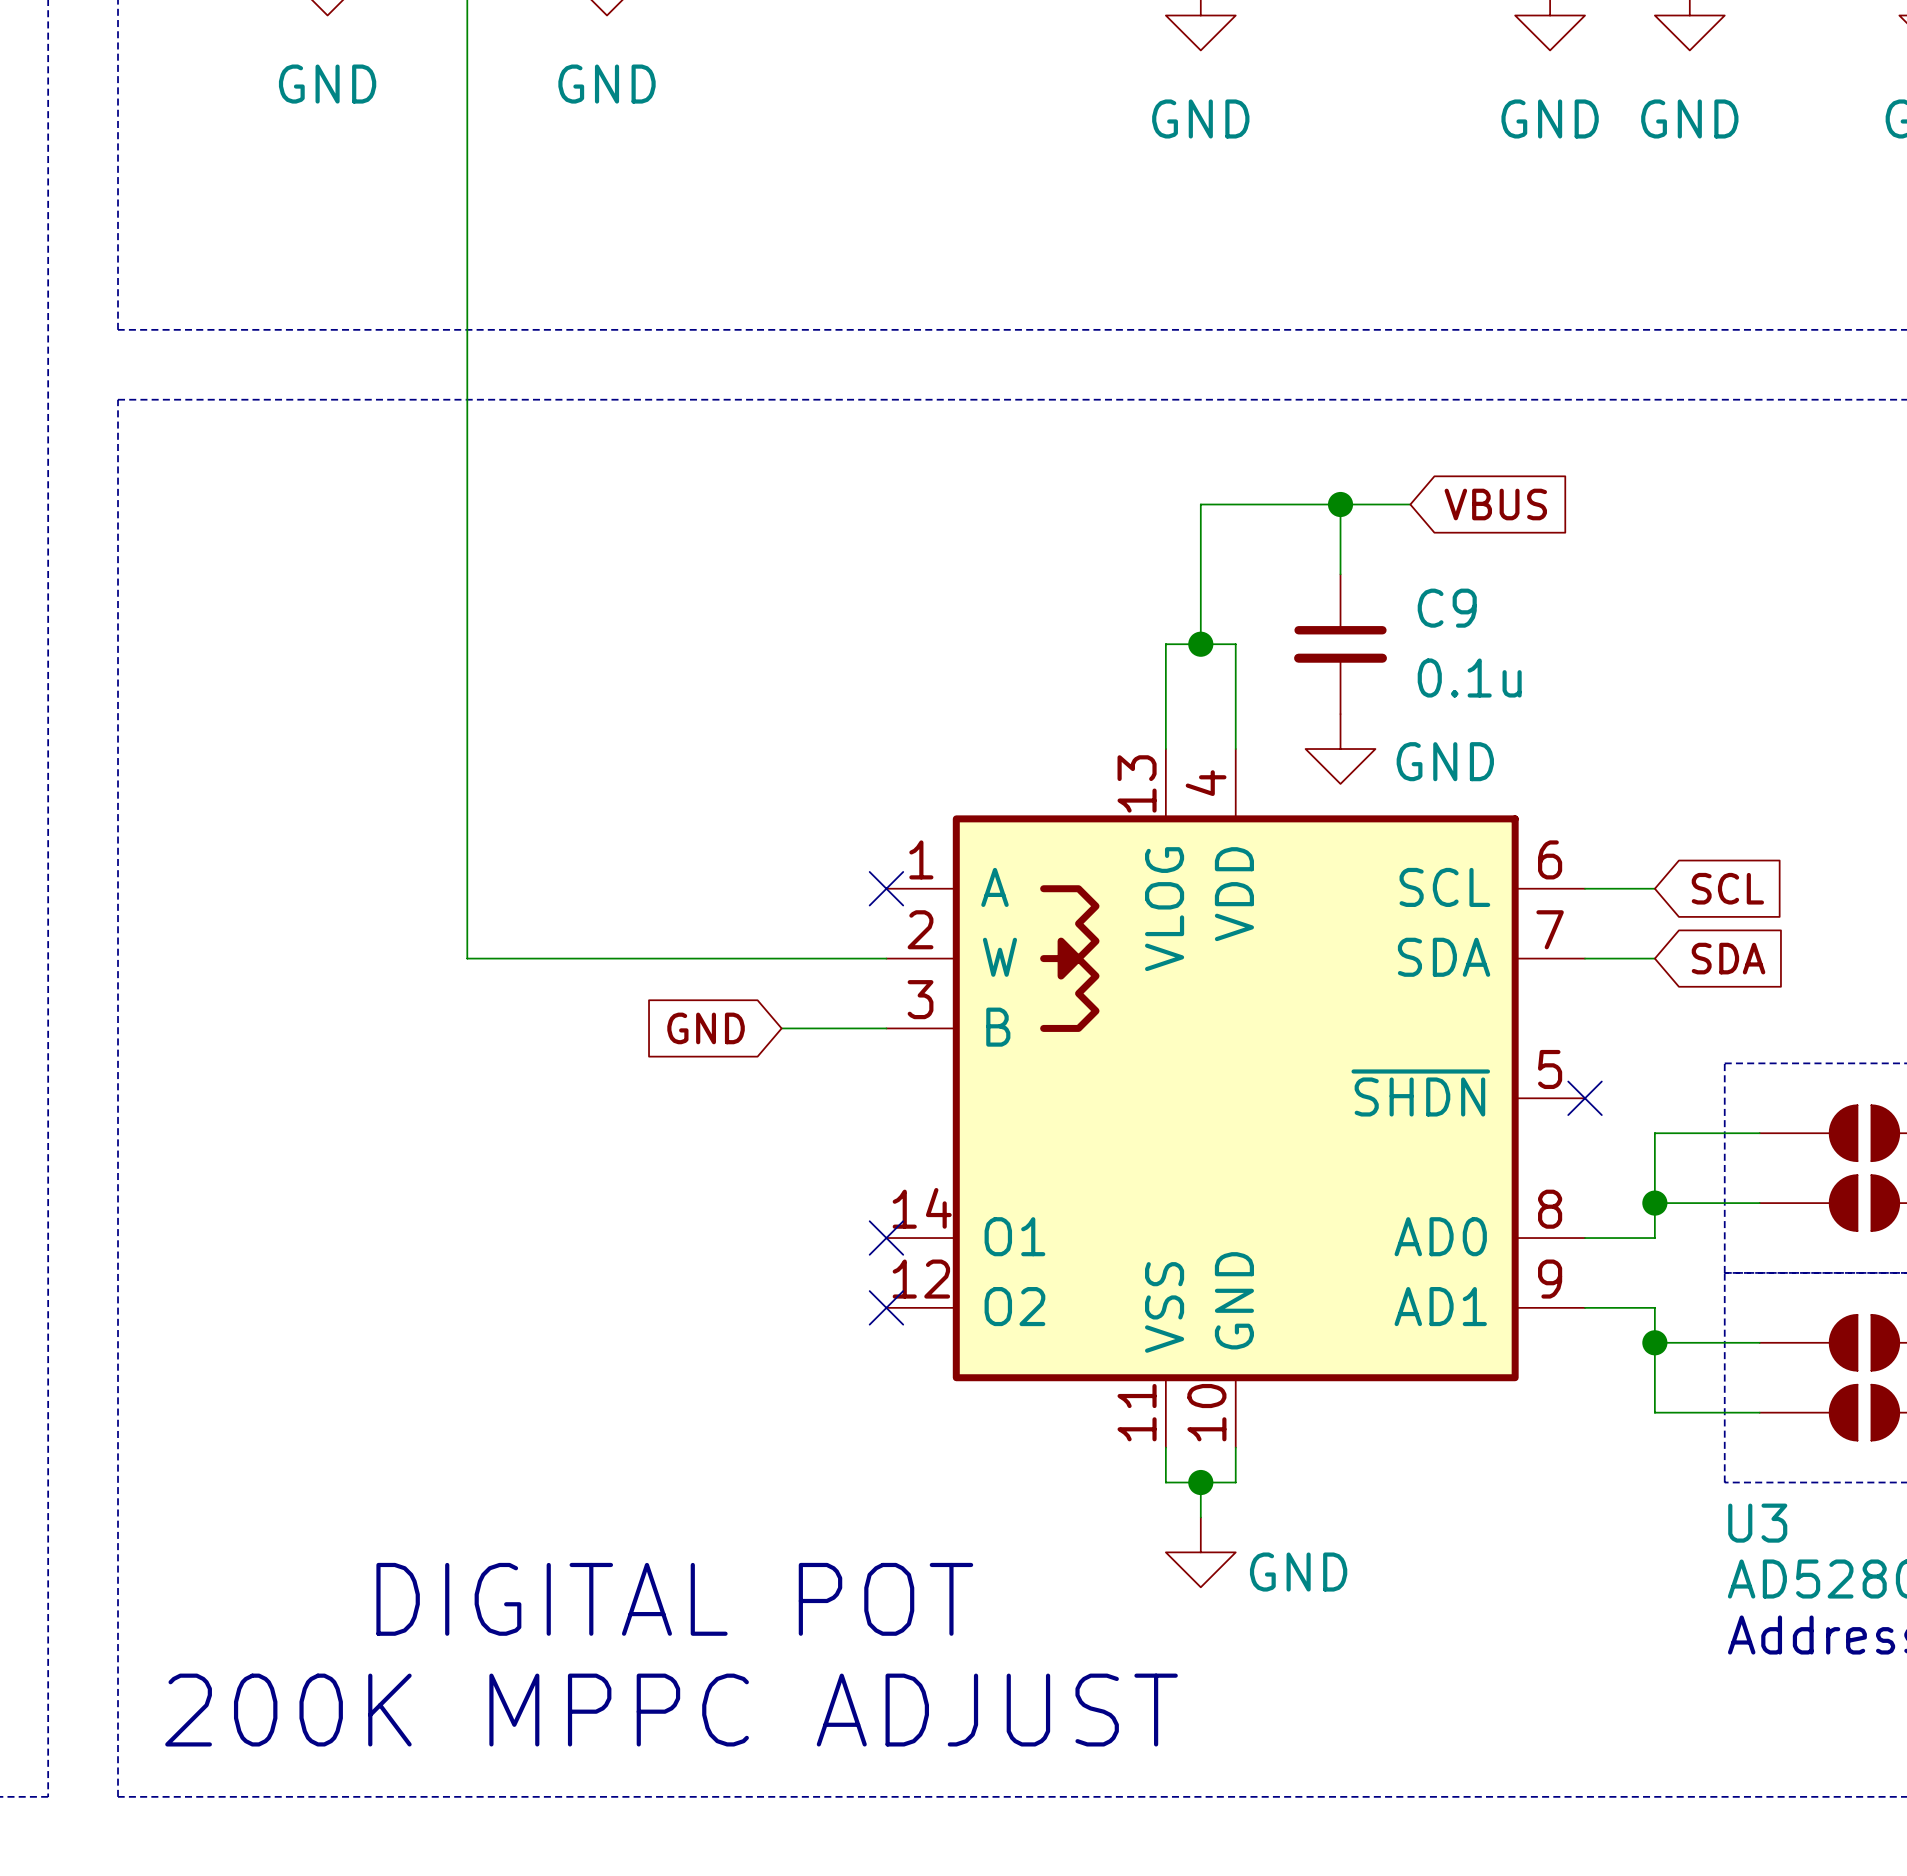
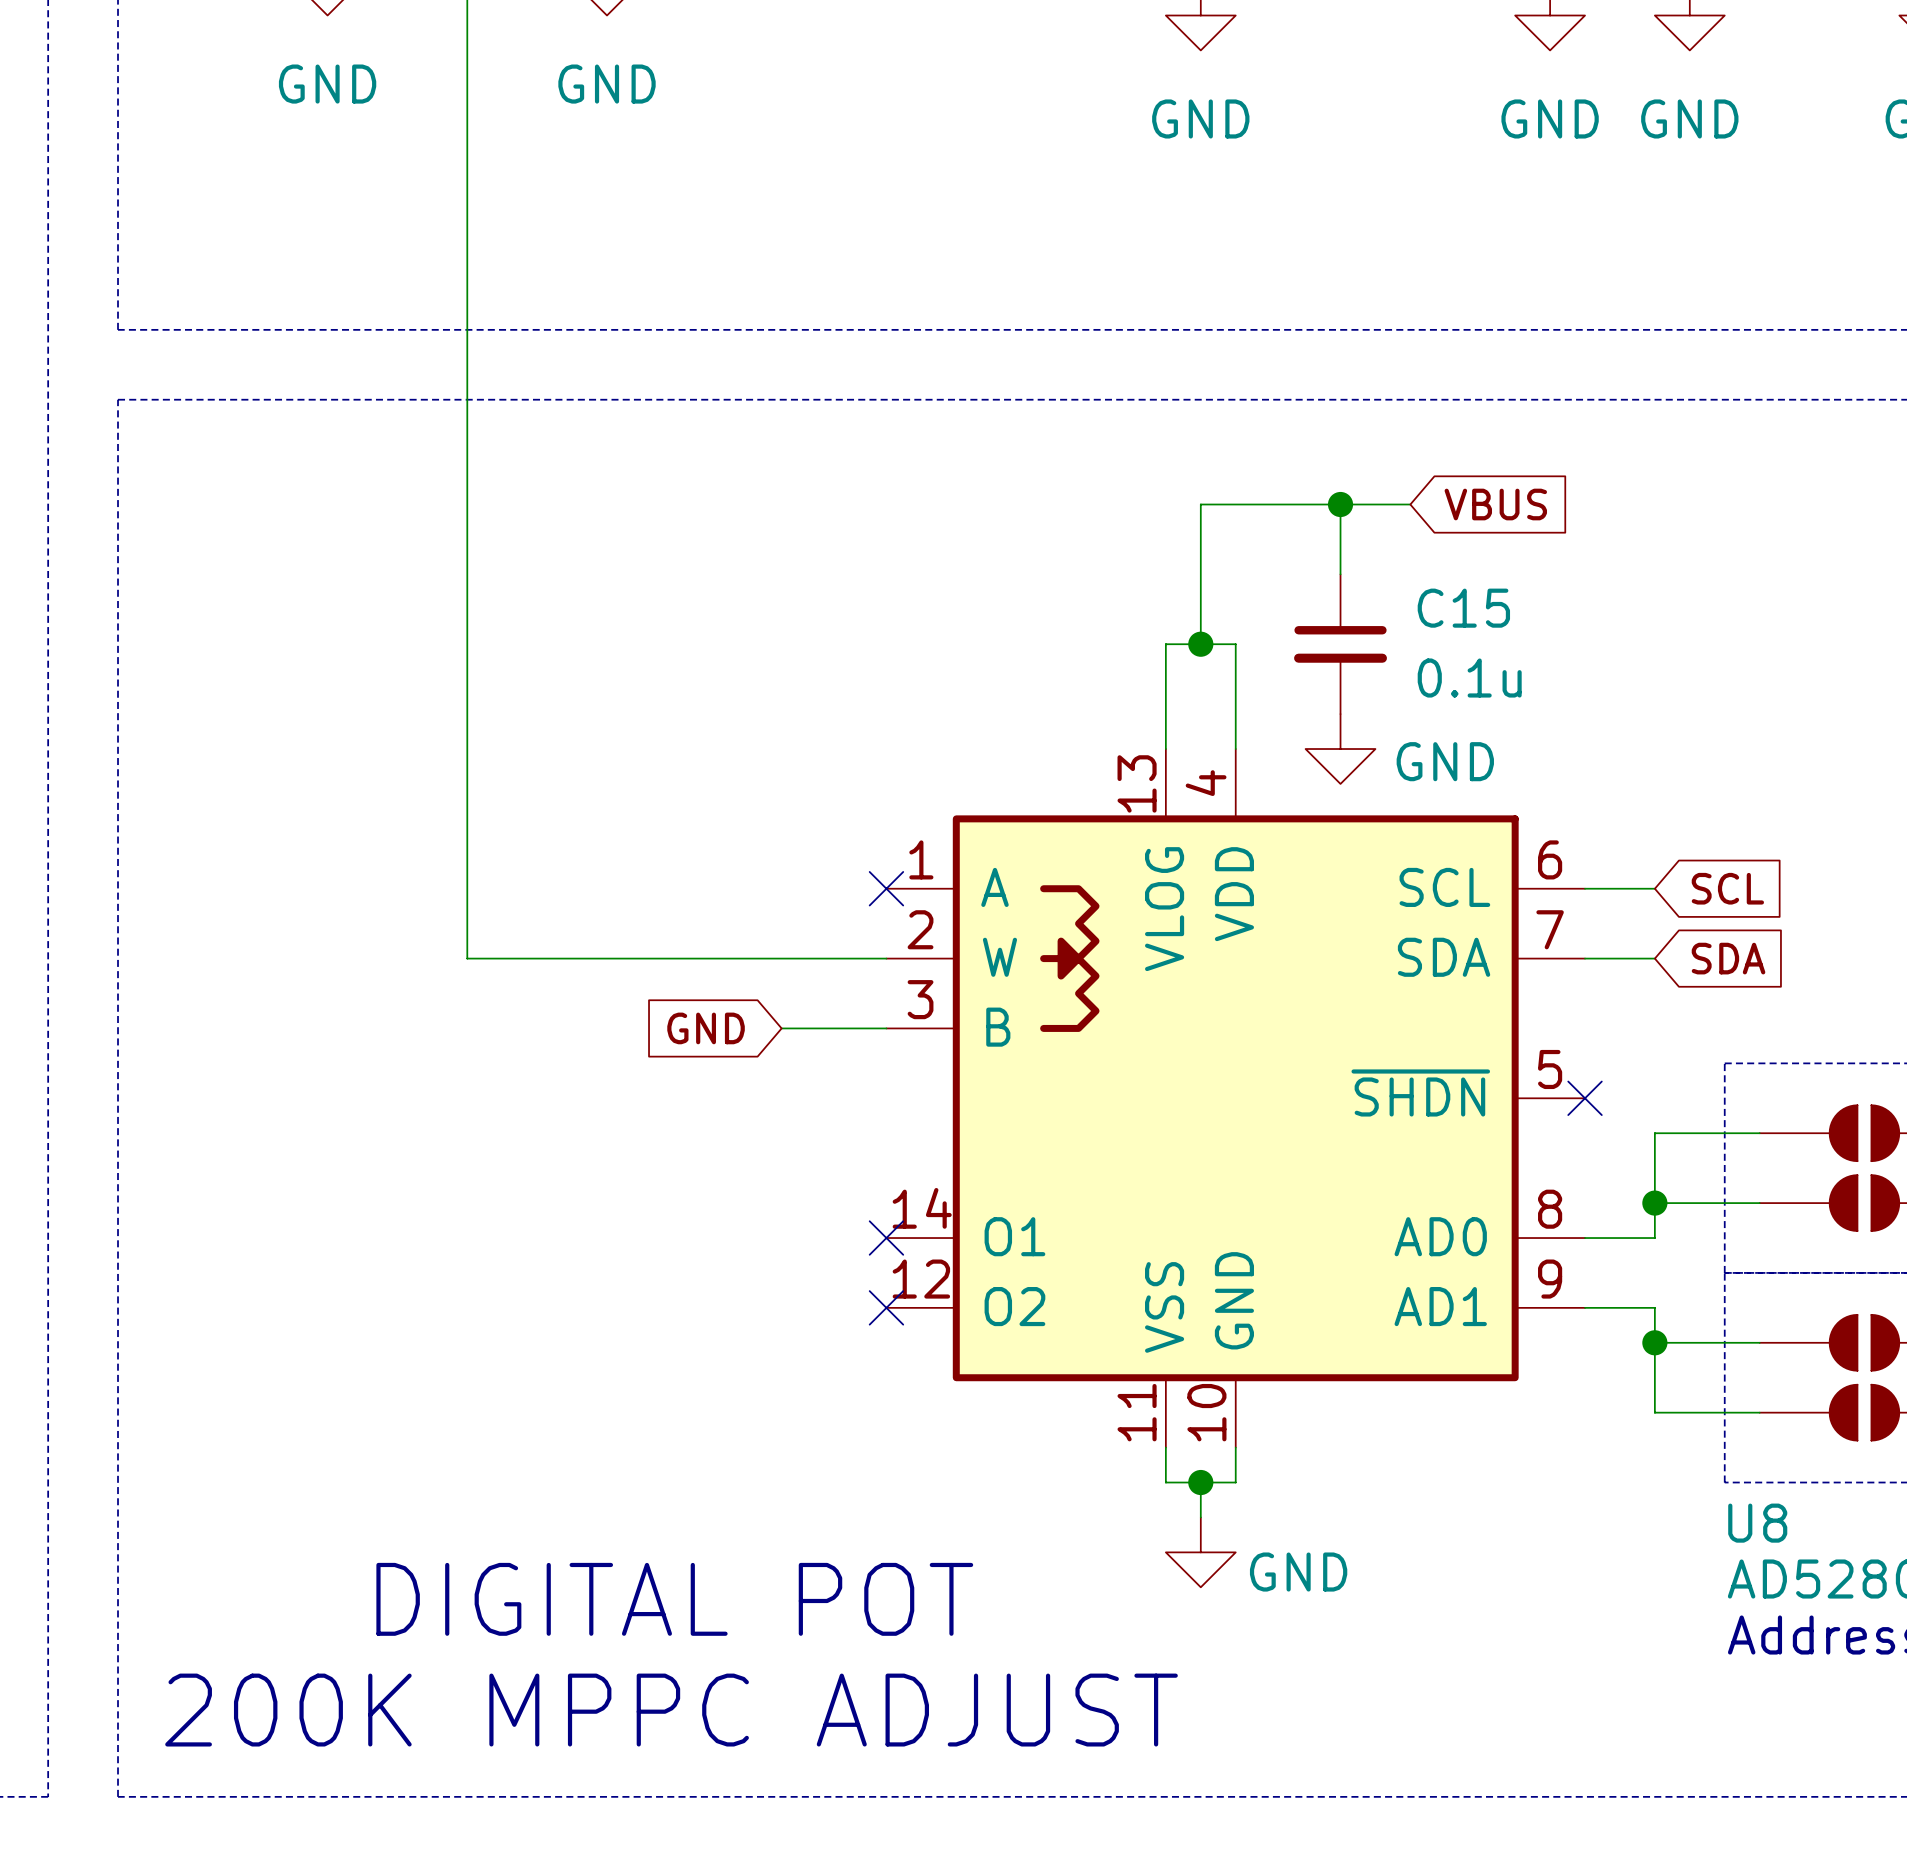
C9 name: C9 (1447, 608) -> C15 (1463, 608)
U3 name: U3 (1757, 1523) -> U8 (1757, 1523)

